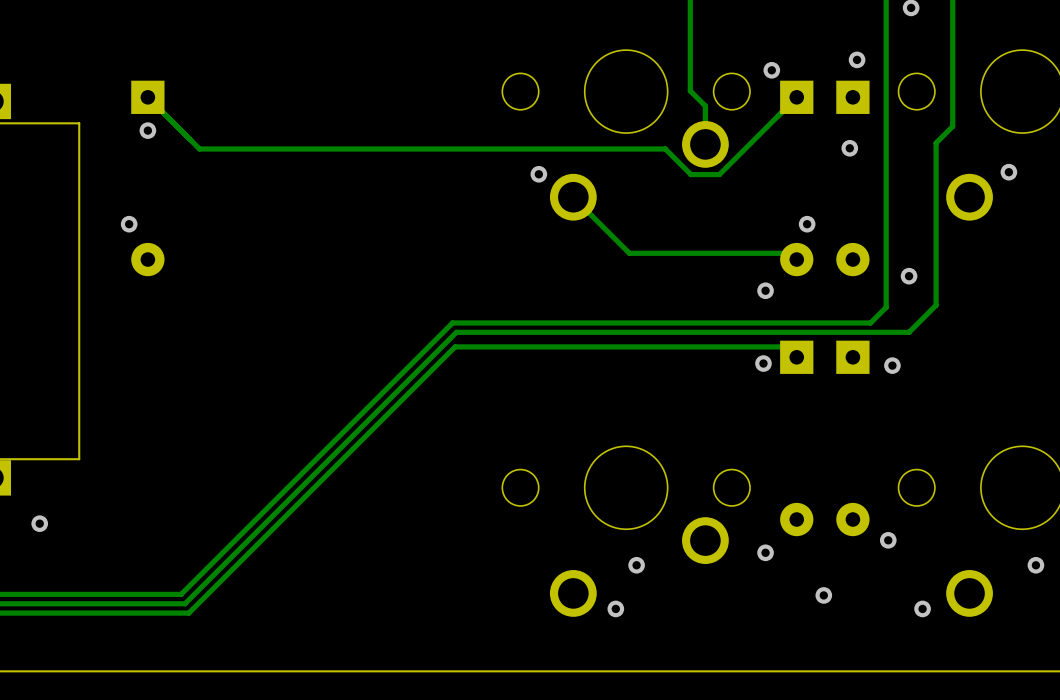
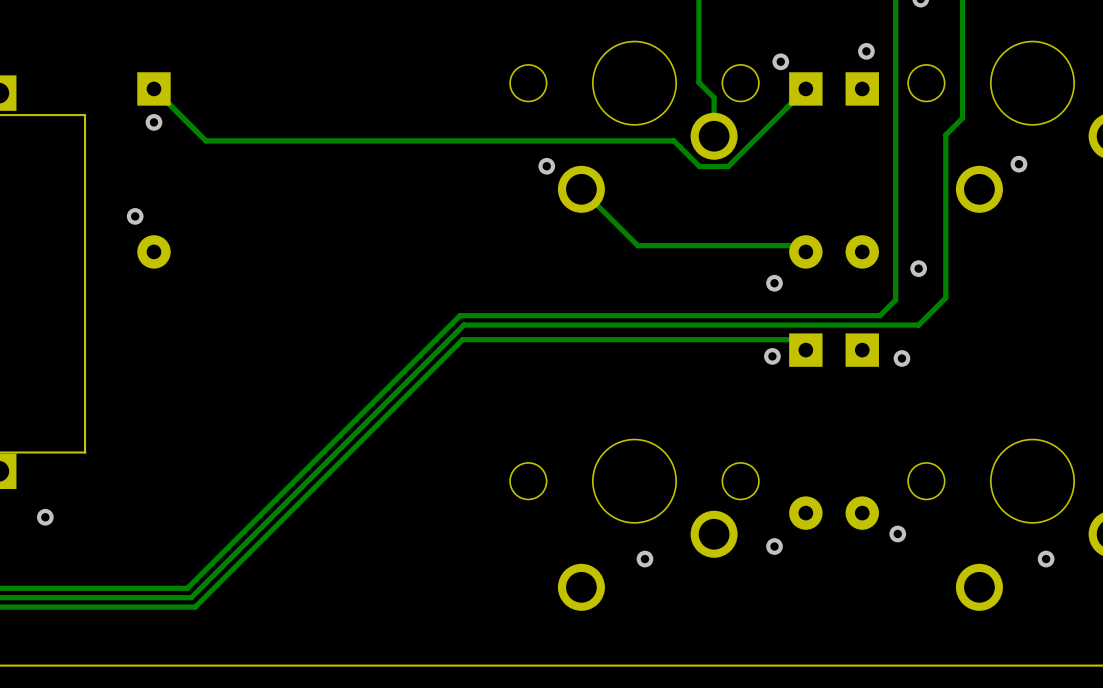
via: (849, 148) -> none
via: (807, 224) -> none
via: (823, 595) -> none
via: (615, 608) -> none
via: (922, 608) -> none

